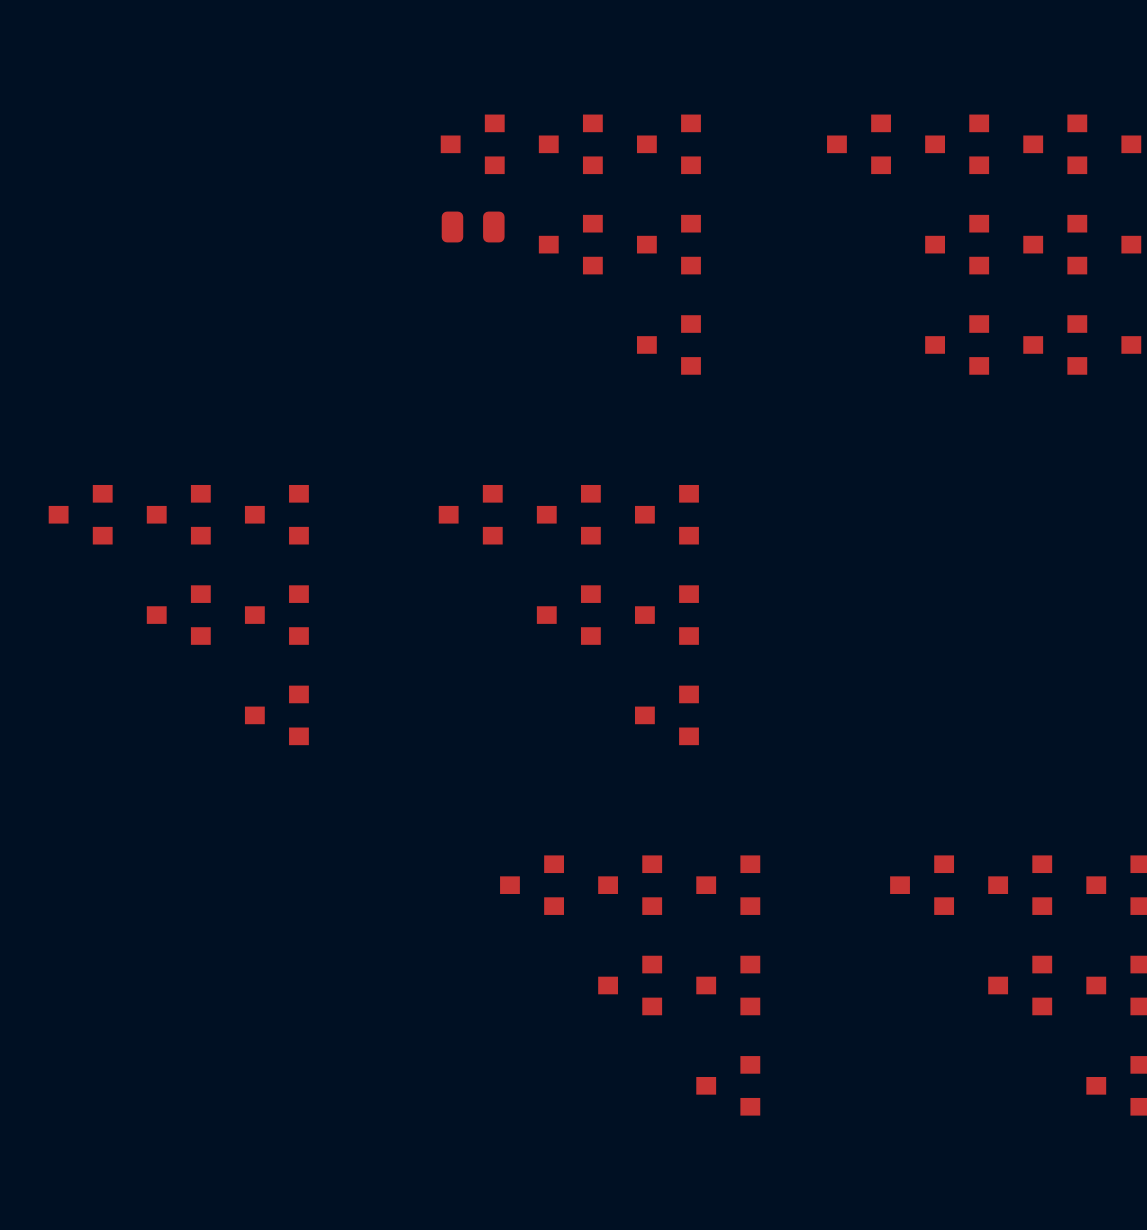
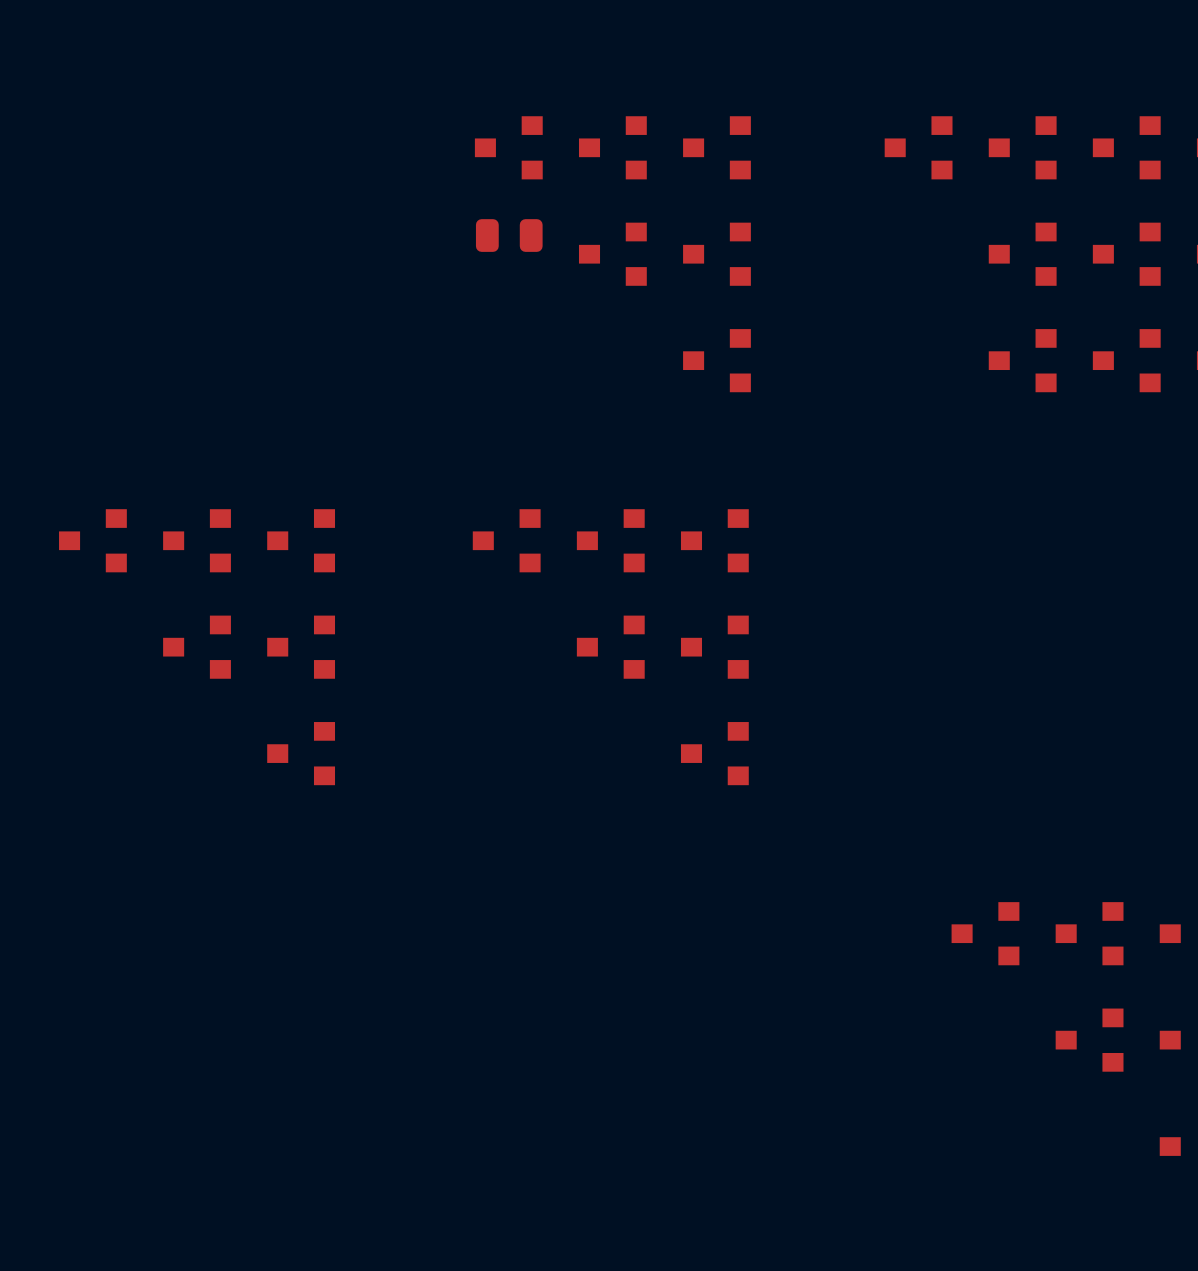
part: (532, 885) -> none
part: (630, 885) -> none
part: (728, 885) -> none
part: (630, 985) -> none
part: (728, 985) -> none
part: (728, 1085) -> none

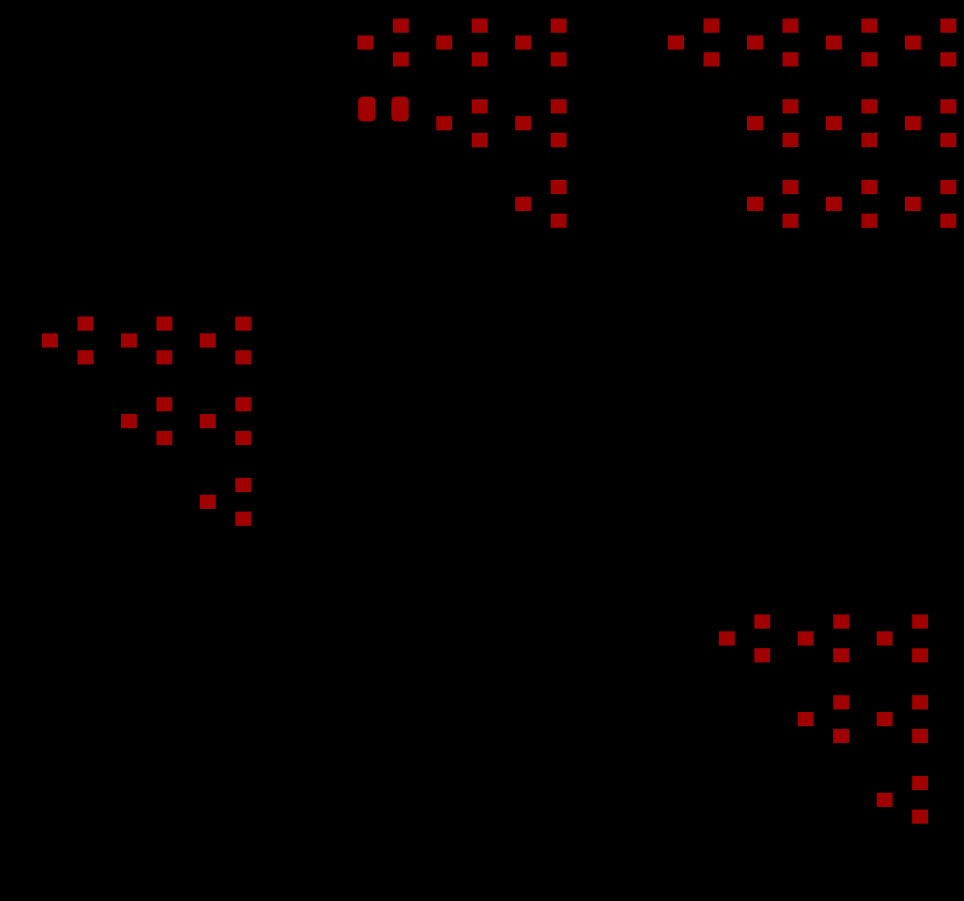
part: (506, 540) -> none
part: (610, 540) -> none
part: (714, 540) -> none
part: (610, 647) -> none
part: (714, 647) -> none
part: (714, 753) -> none

